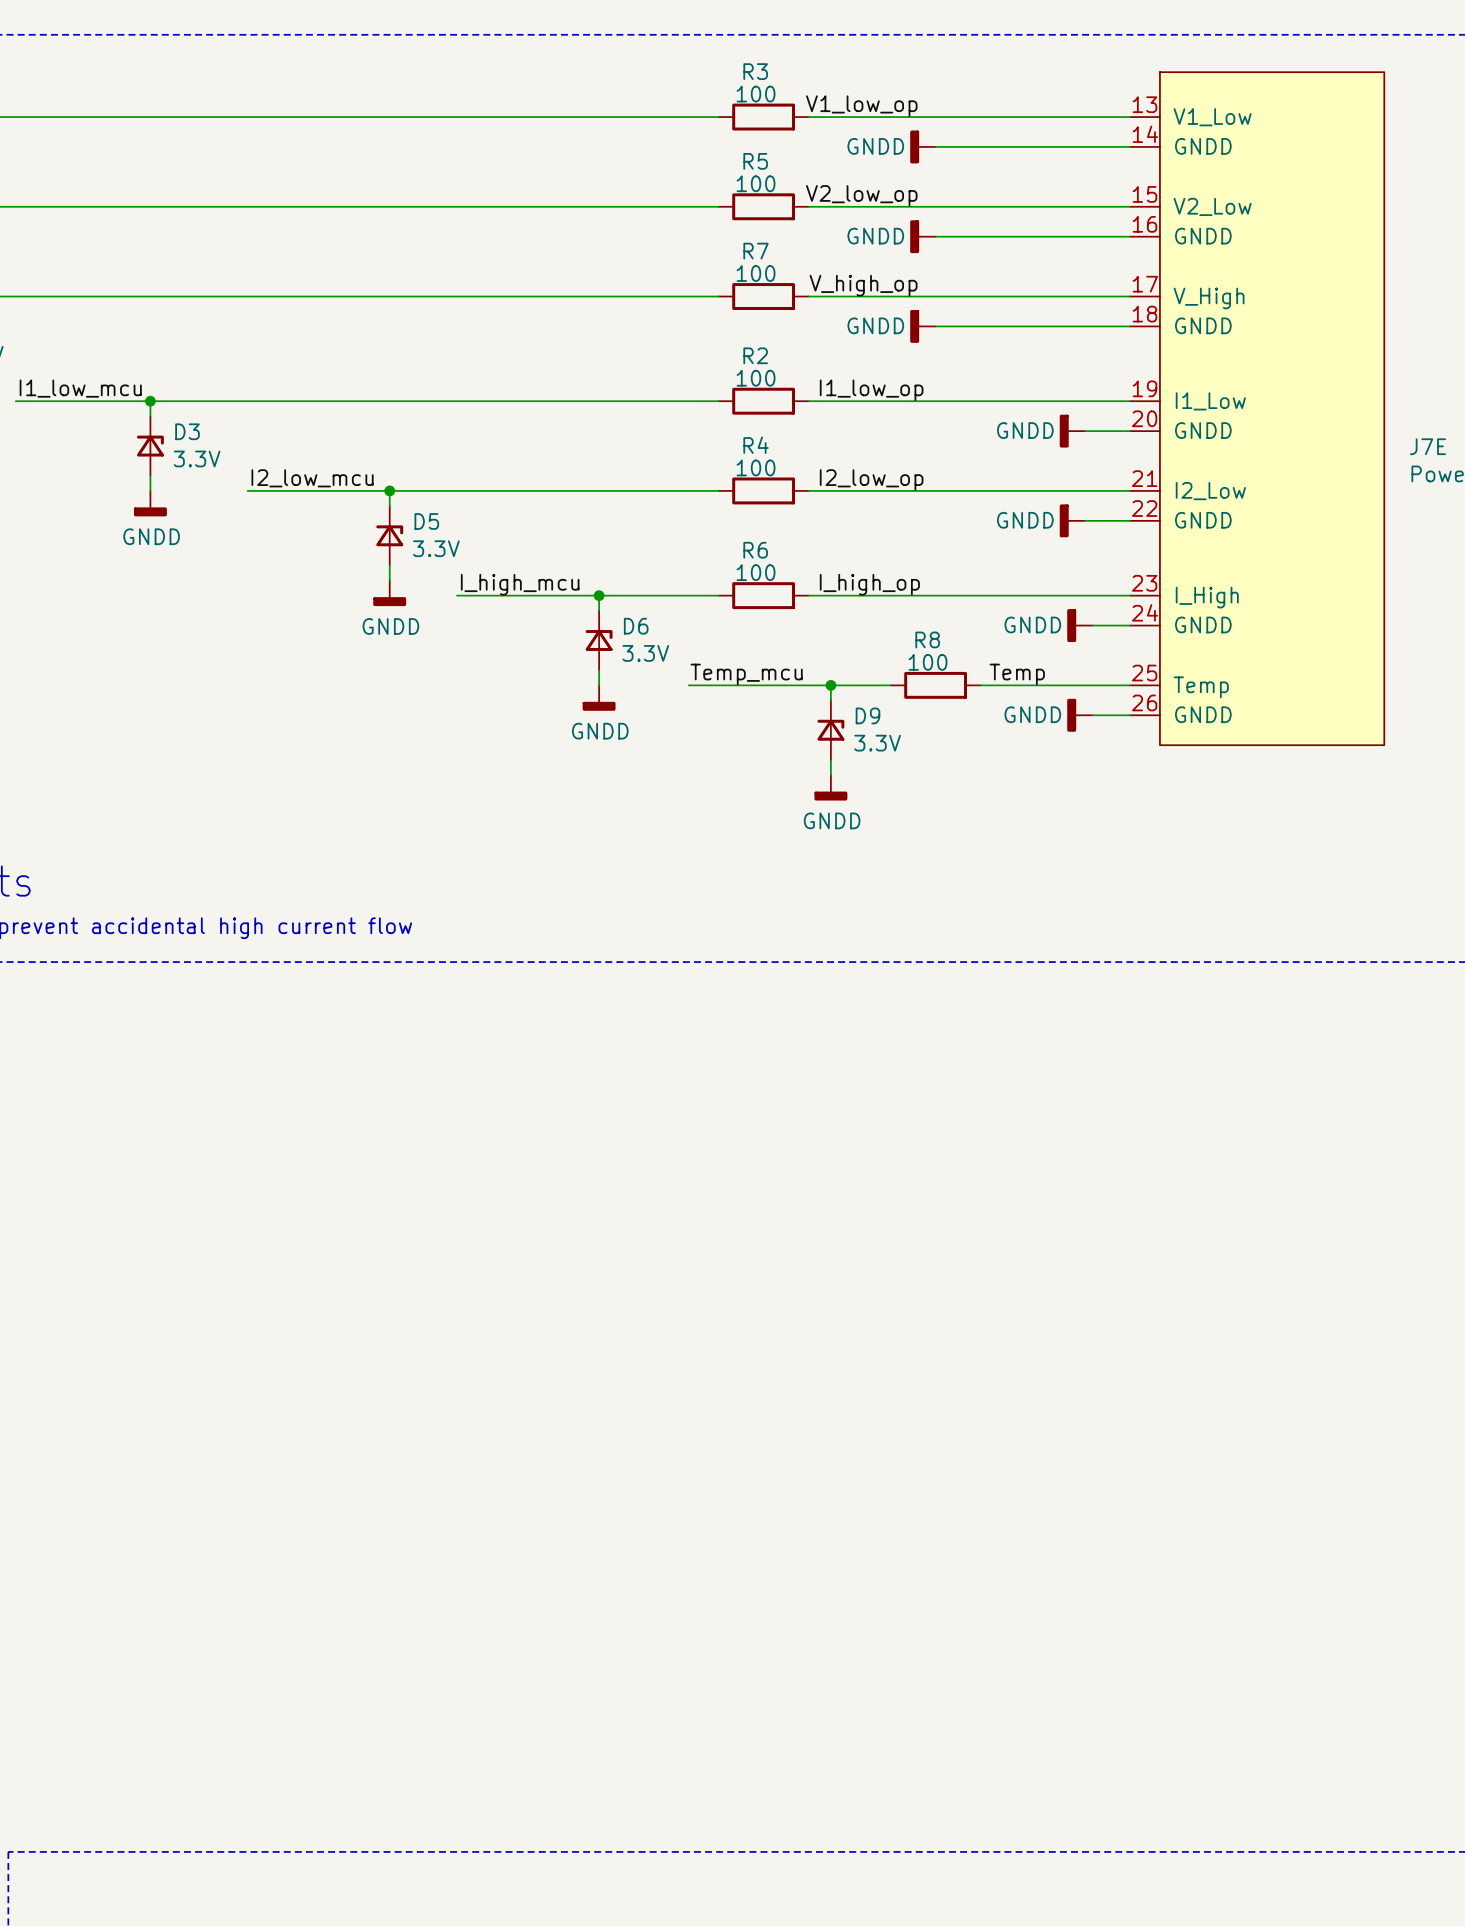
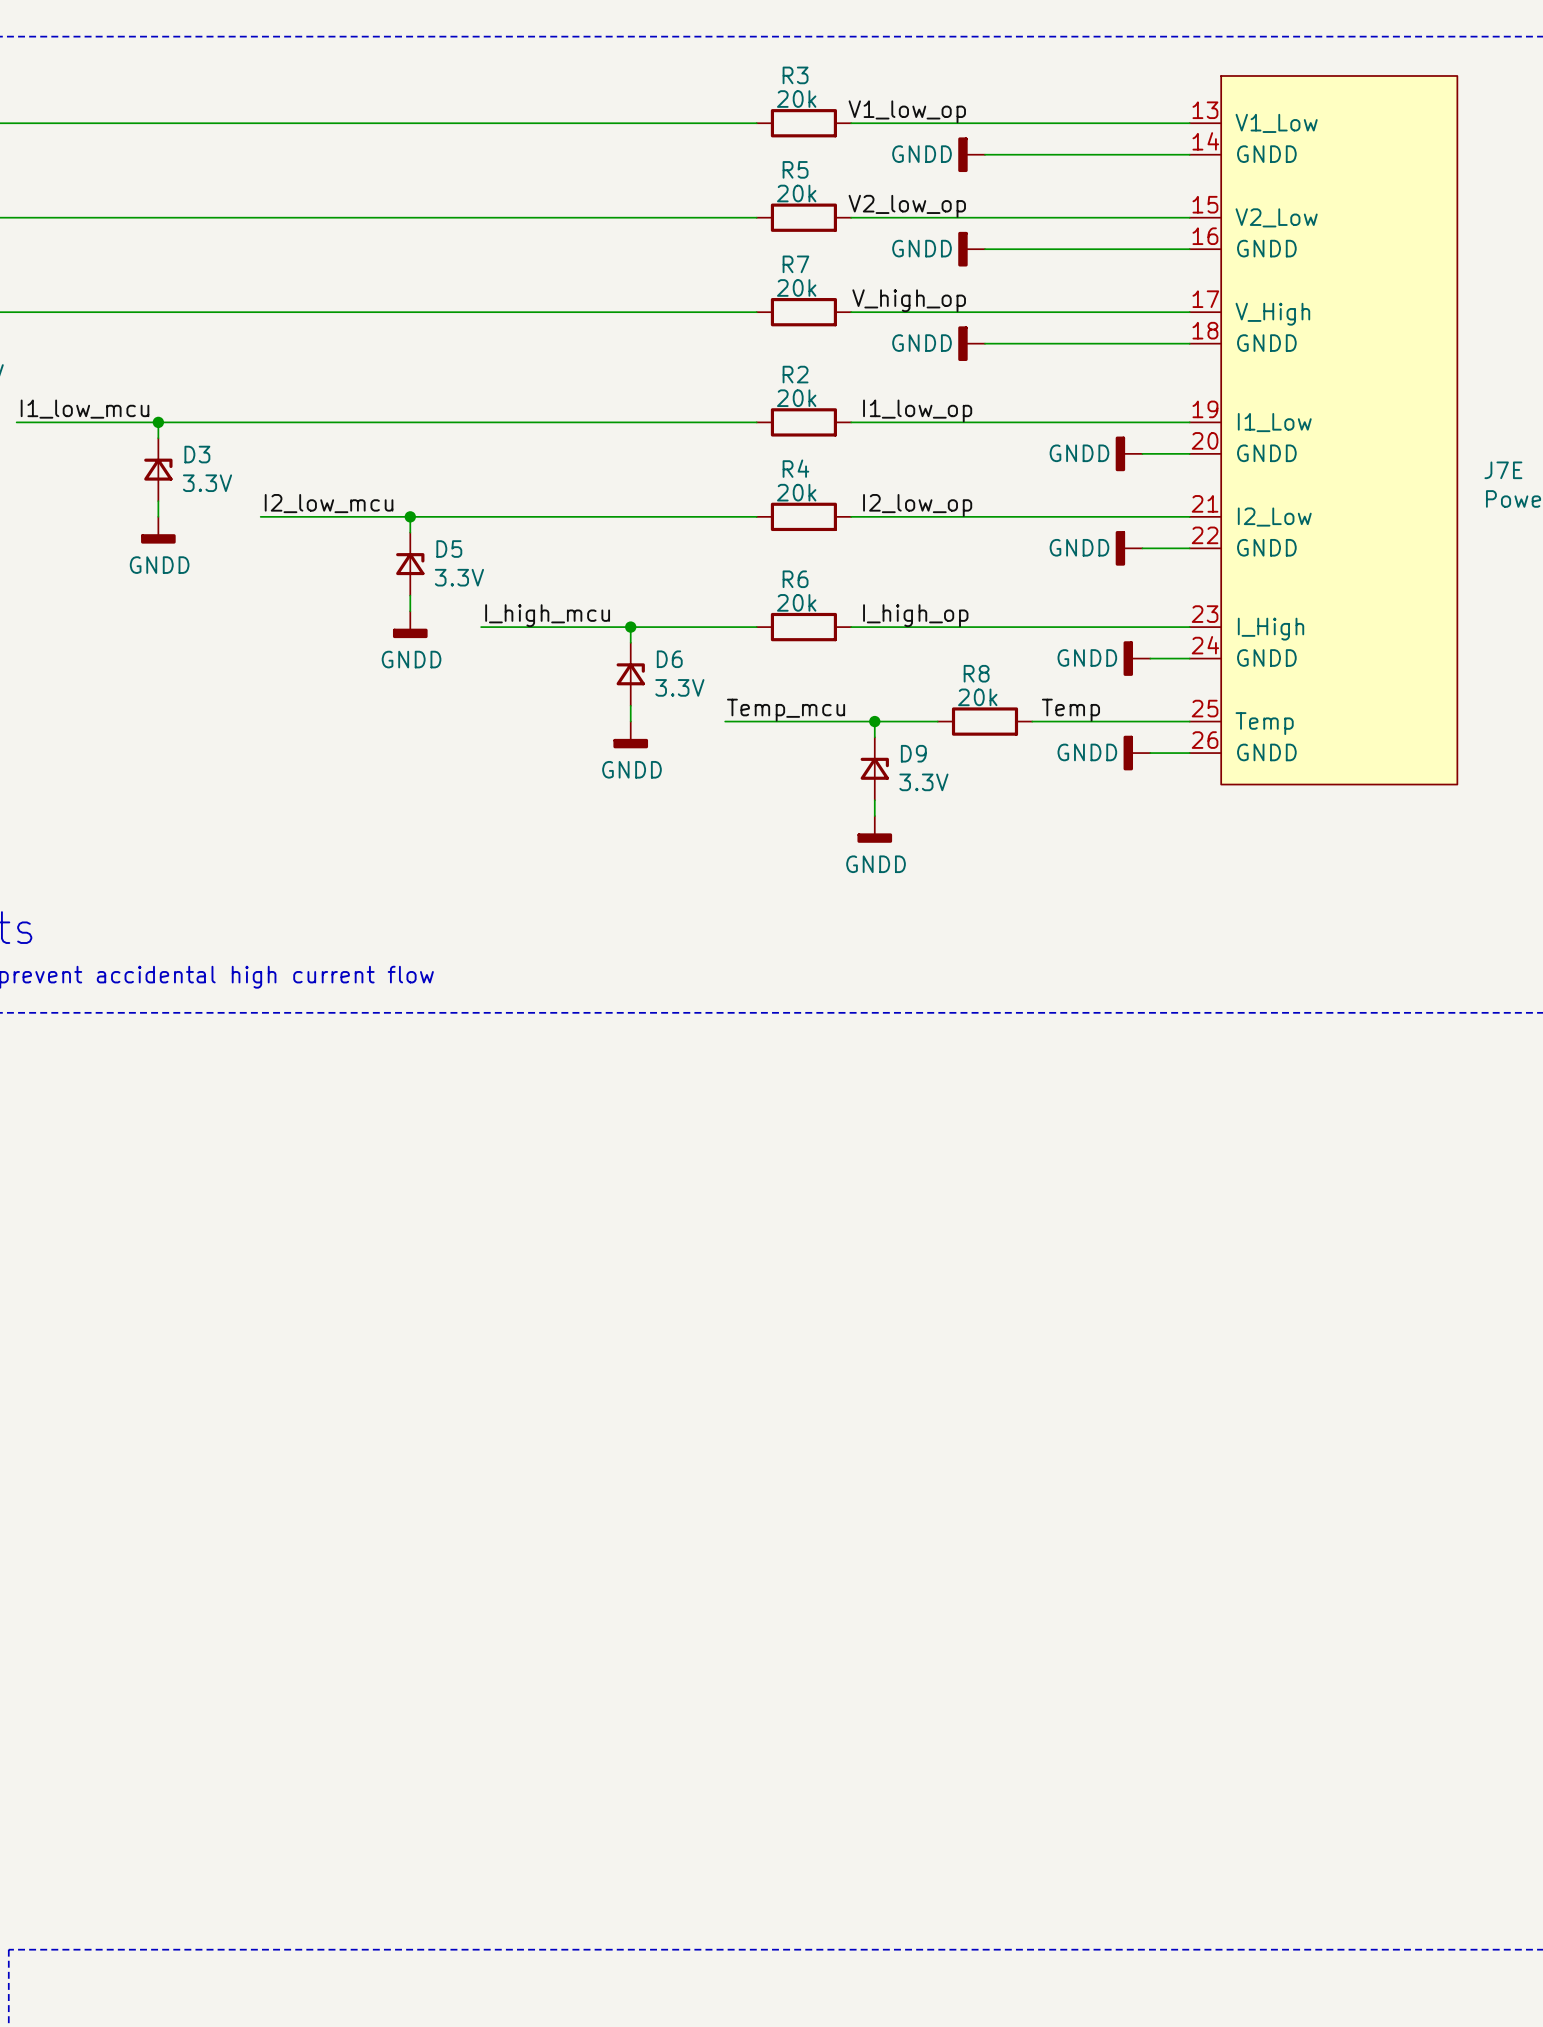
R3 value: 100 (756, 94) -> 20k (796, 99)
R5 value: 100 (756, 183) -> 20k (796, 193)
R7 value: 100 (756, 273) -> 20k (796, 287)
R2 value: 100 (756, 378) -> 20k (796, 398)
R4 value: 100 (756, 467) -> 20k (796, 492)
R6 value: 100 (756, 572) -> 20k (796, 602)
R8 value: 100 (928, 662) -> 20k (977, 697)

